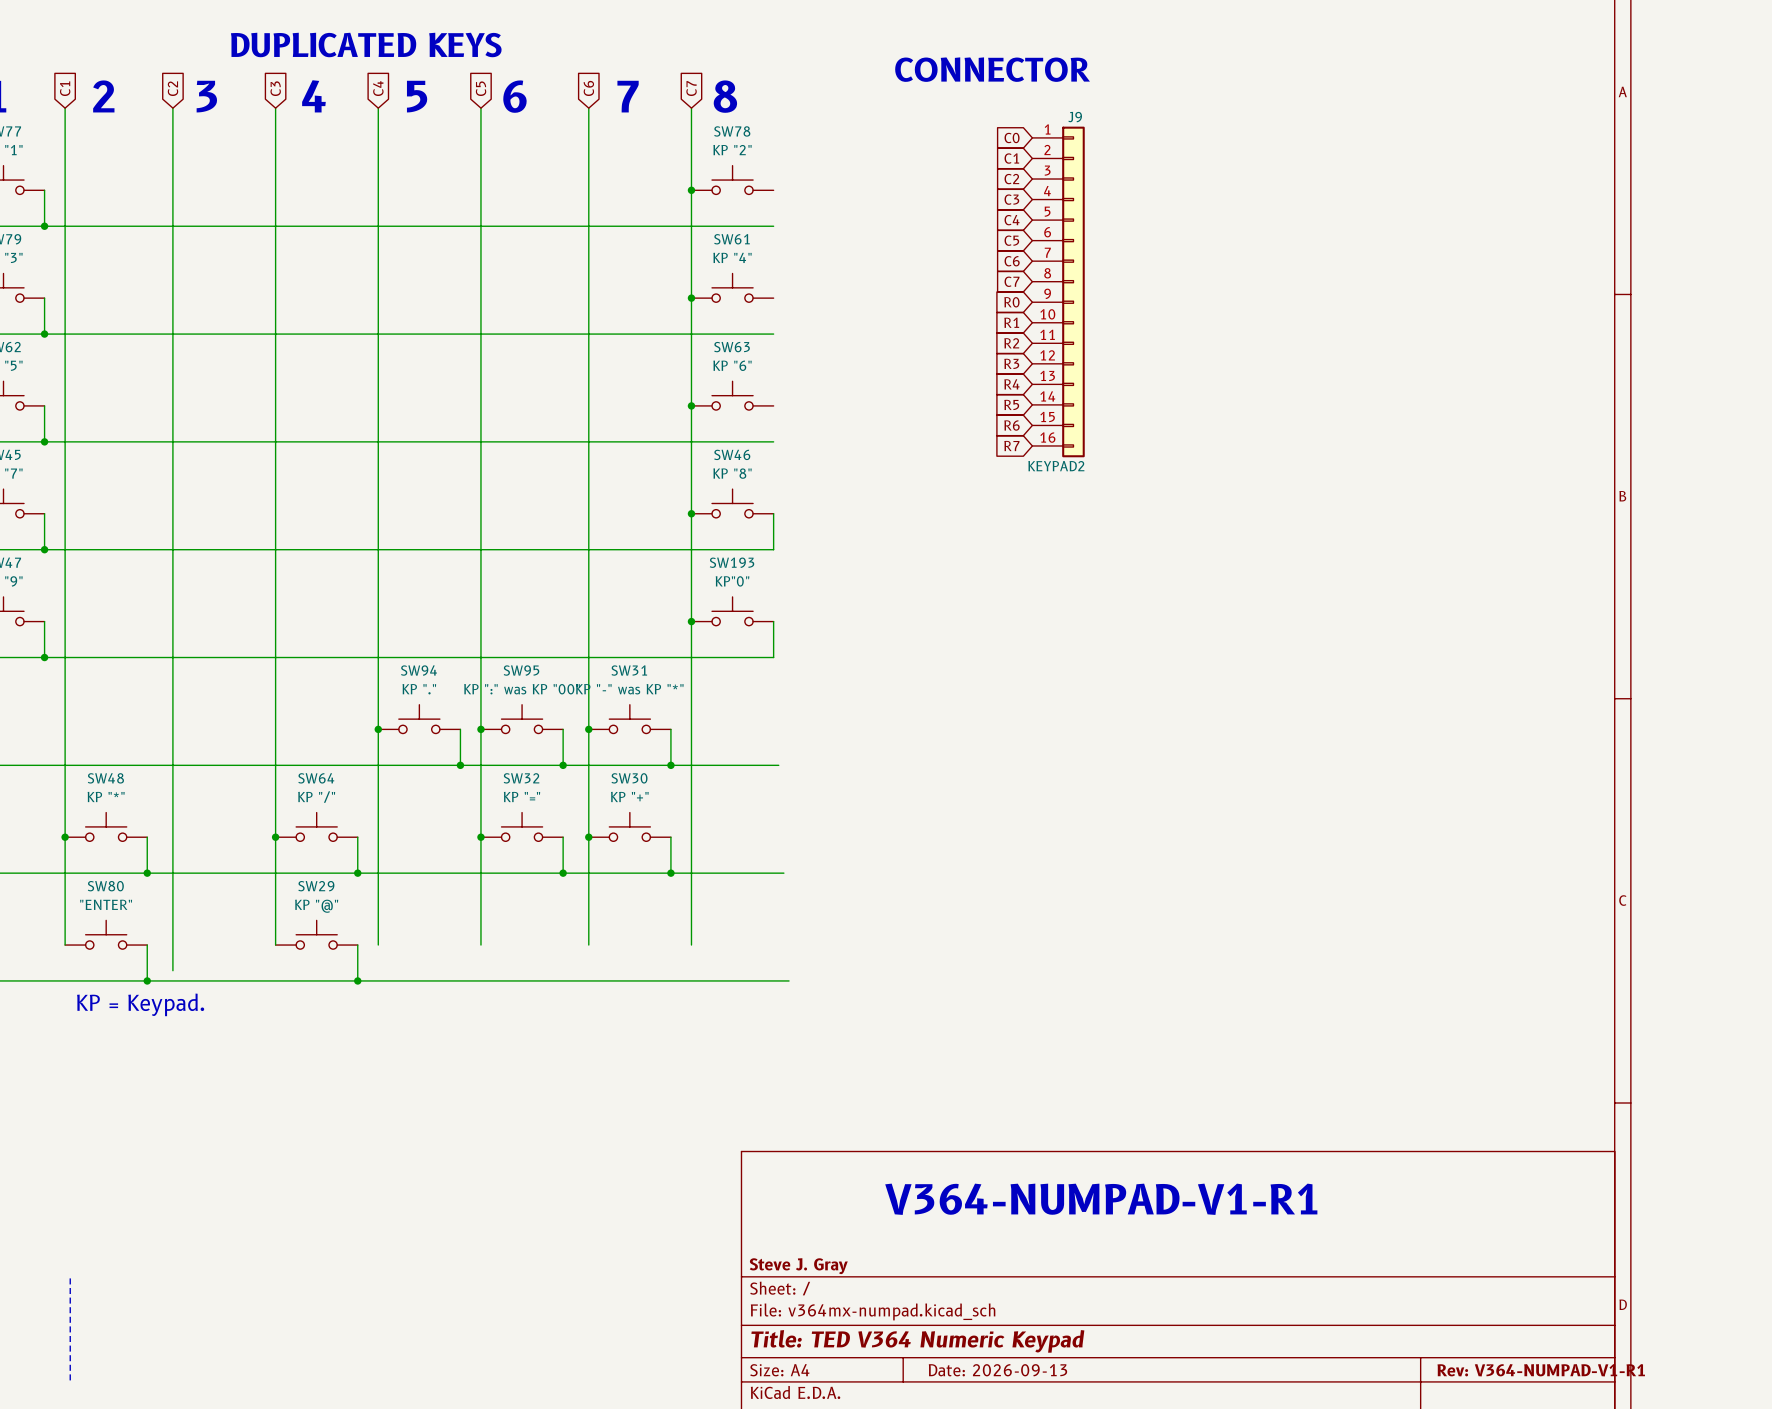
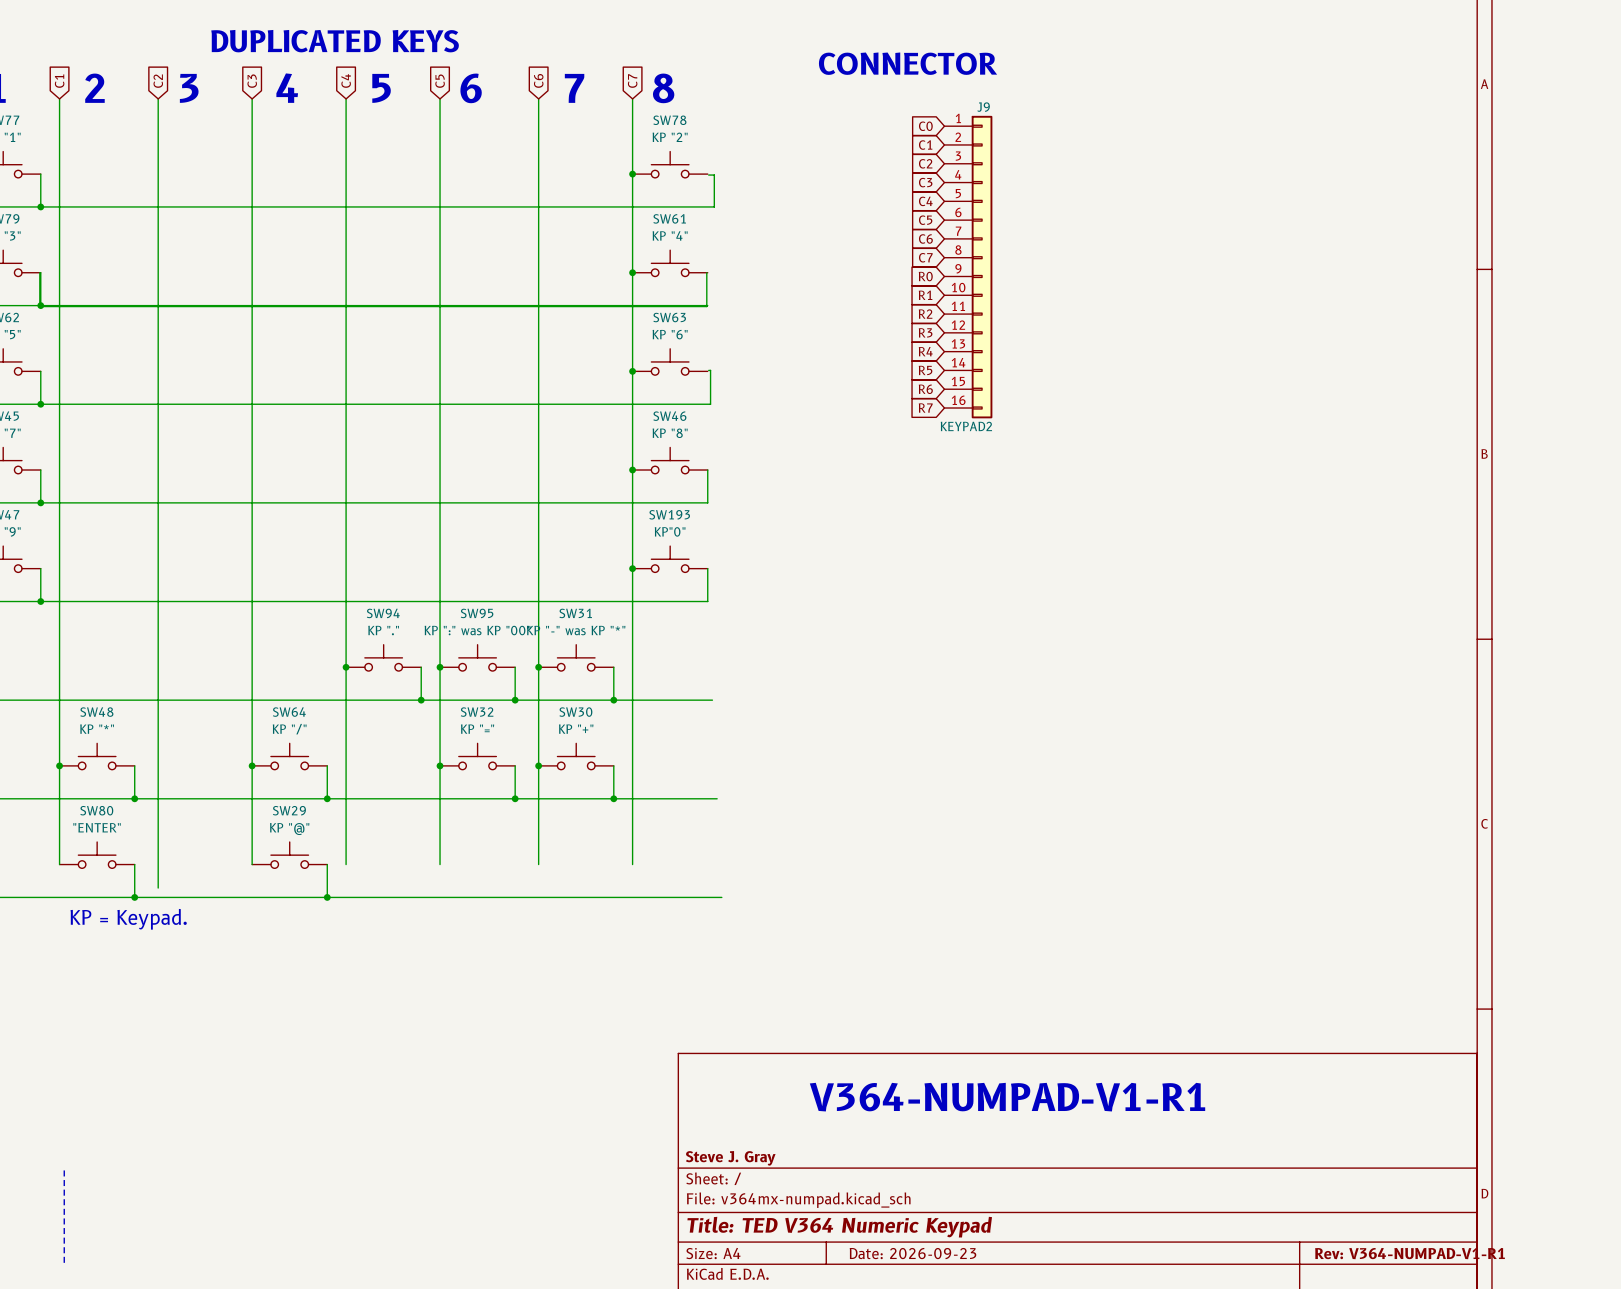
wire: none -> (708, 175) (714, 175) (714, 206) (707, 206)
wire: none -> (39, 272) (39, 306) (706, 306) (706, 272)
wire: none -> (708, 370) (710, 370) (710, 404) (707, 404)
title block: Date: 2026-09-13 (997, 1370) -> Date: 2026-09-23 (912, 1253)

